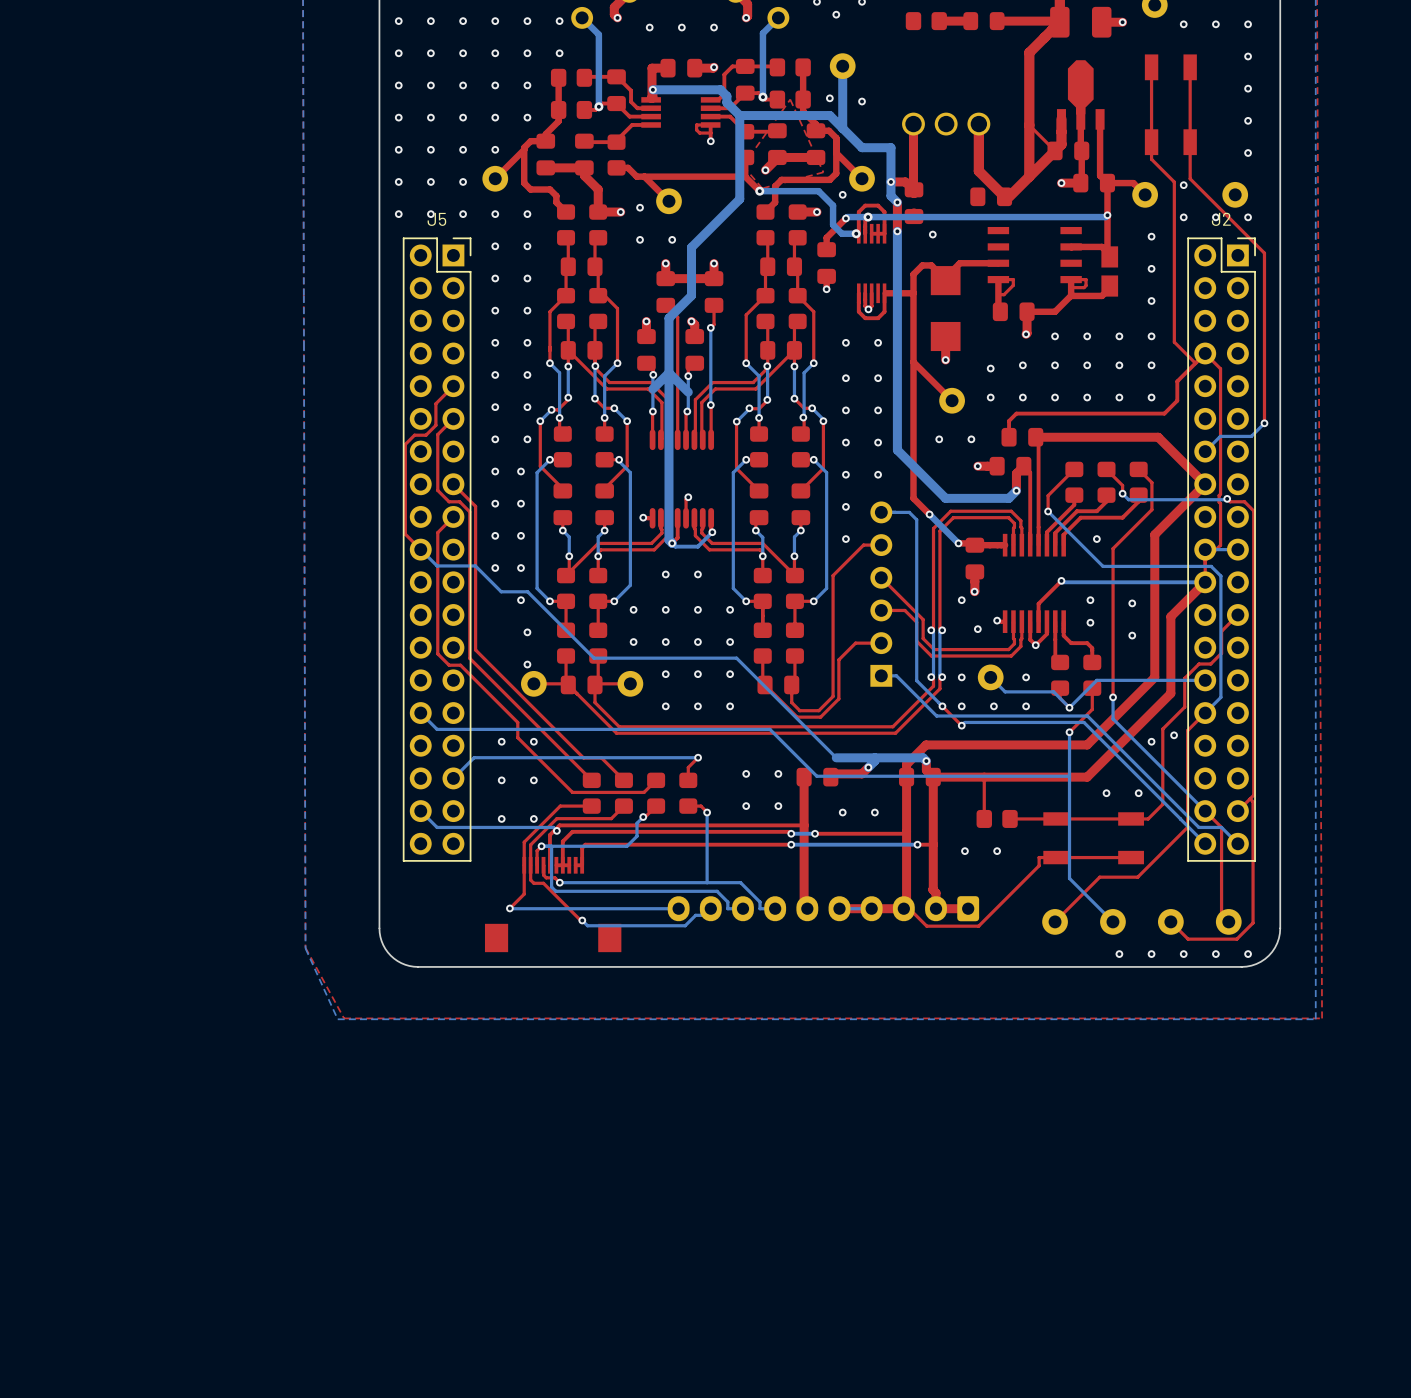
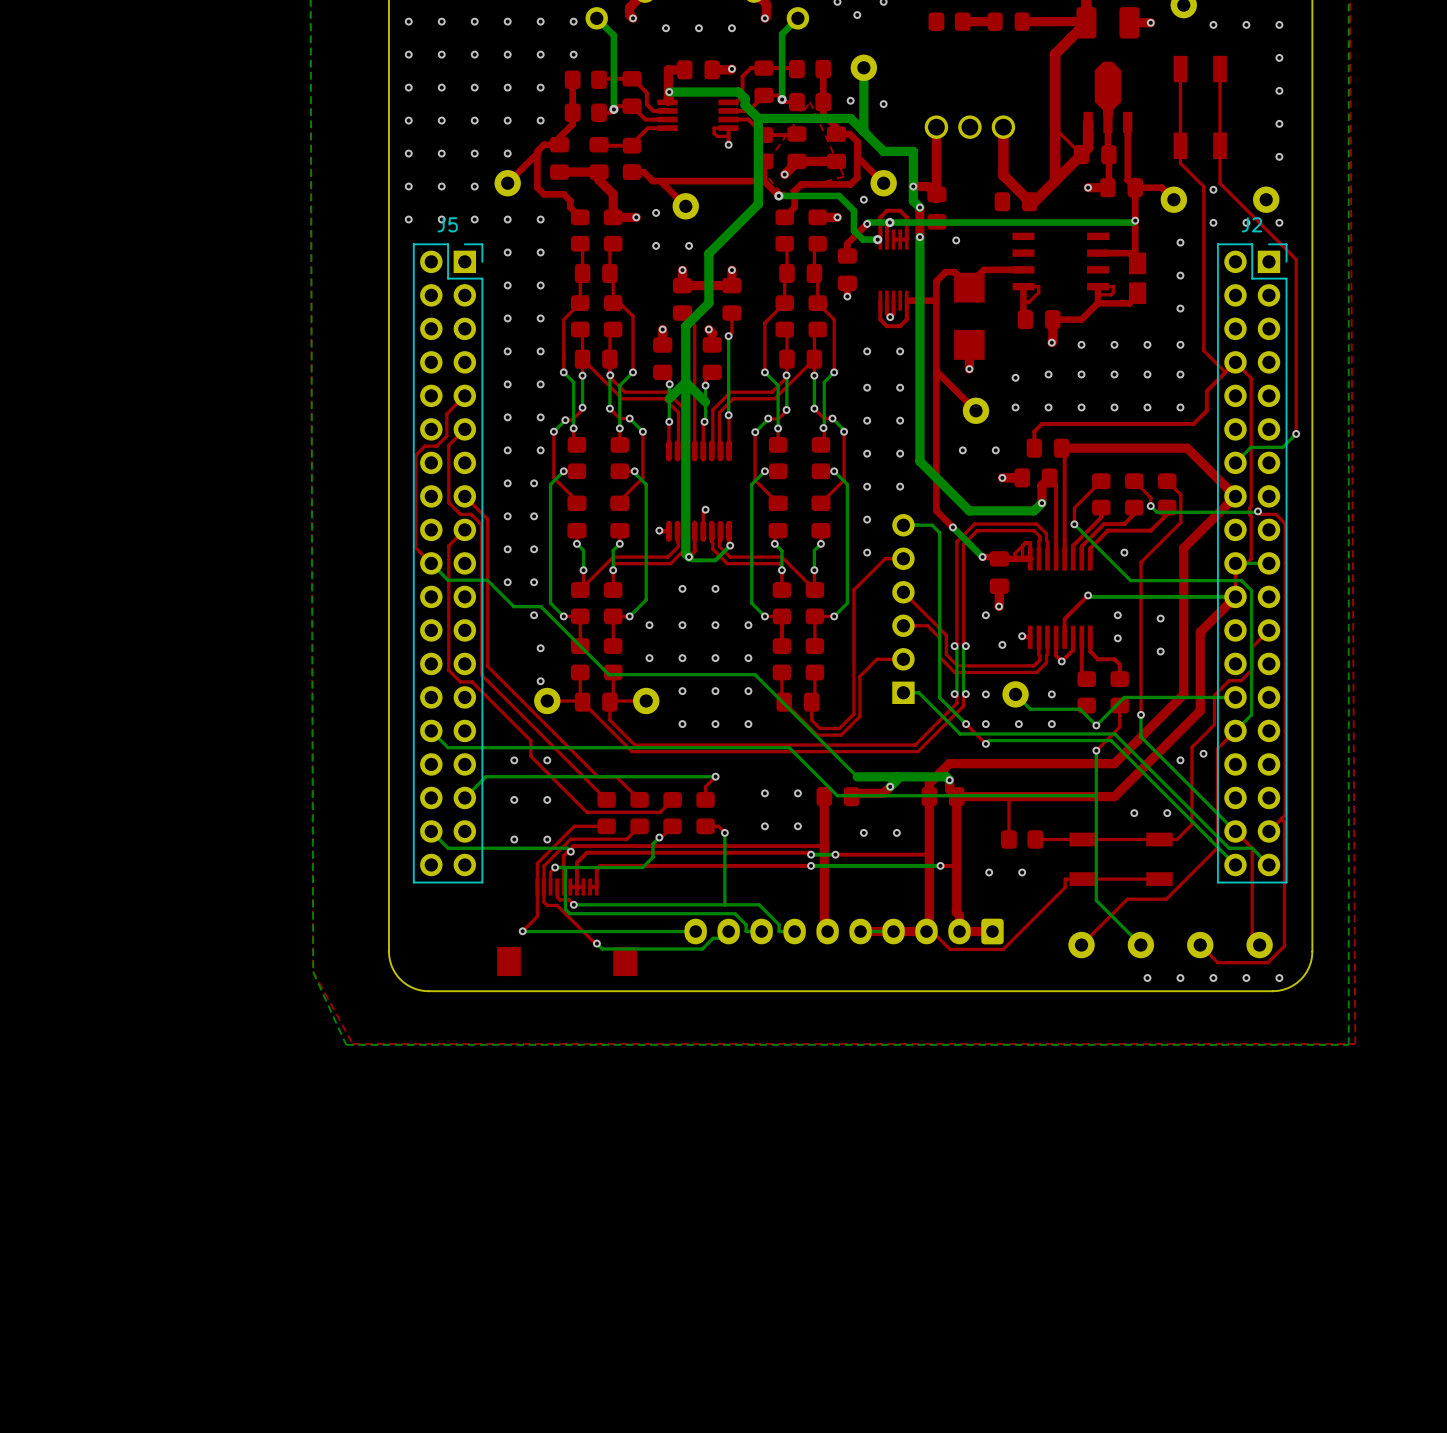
top track: none -> (1025, 542) (1022, 545) (1022, 558)
top track: none -> (1025, 542) (1030, 542) (1030, 558)
top track: none -> (1025, 542) (1014, 553) (1014, 558)

